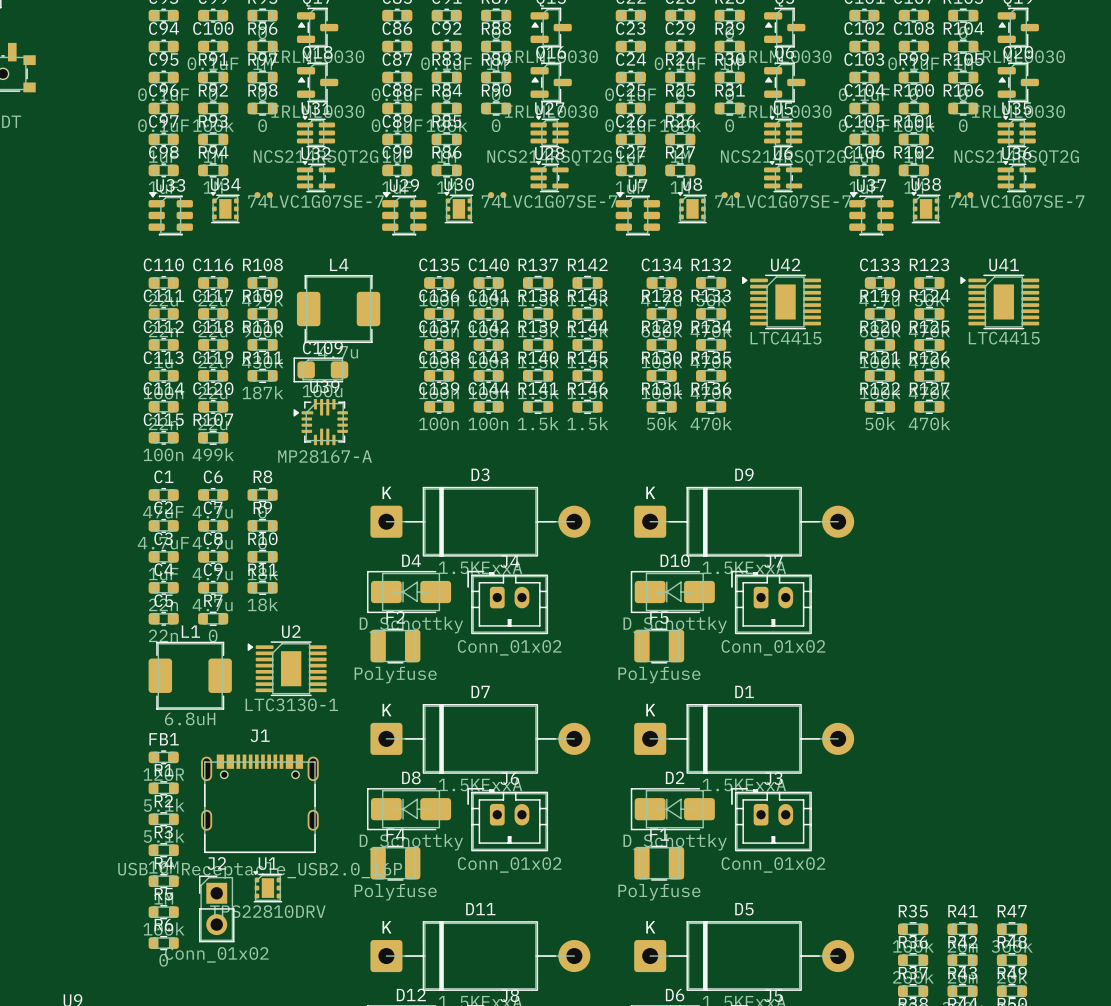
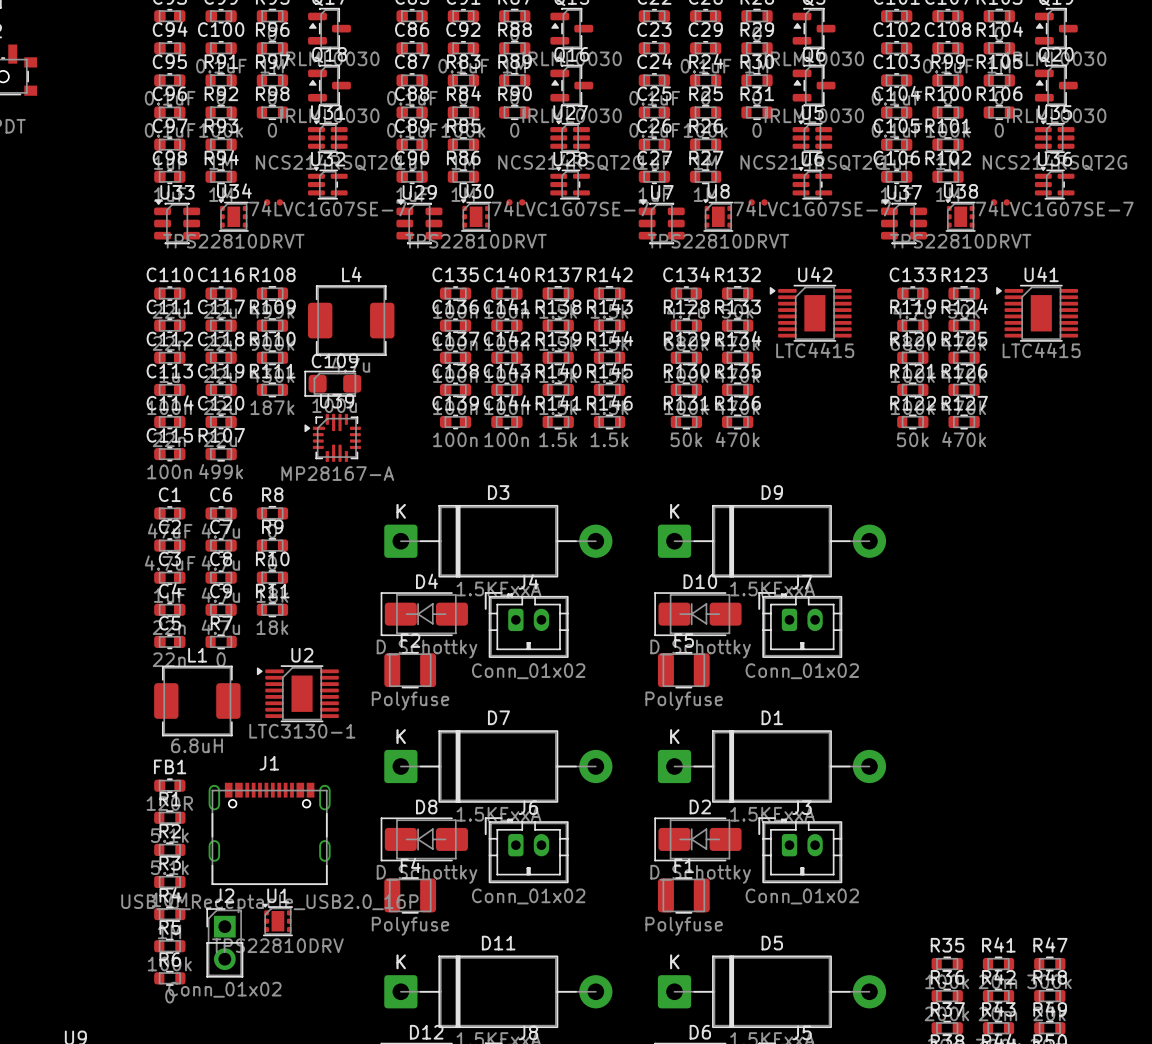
U34 value: none -> TPS22810DRVT (233, 241)
U30 value: none -> TPS22810DRVT (476, 241)
U8 value: none -> TPS22810DRVT (718, 241)
U38 value: none -> TPS22810DRVT (960, 241)

